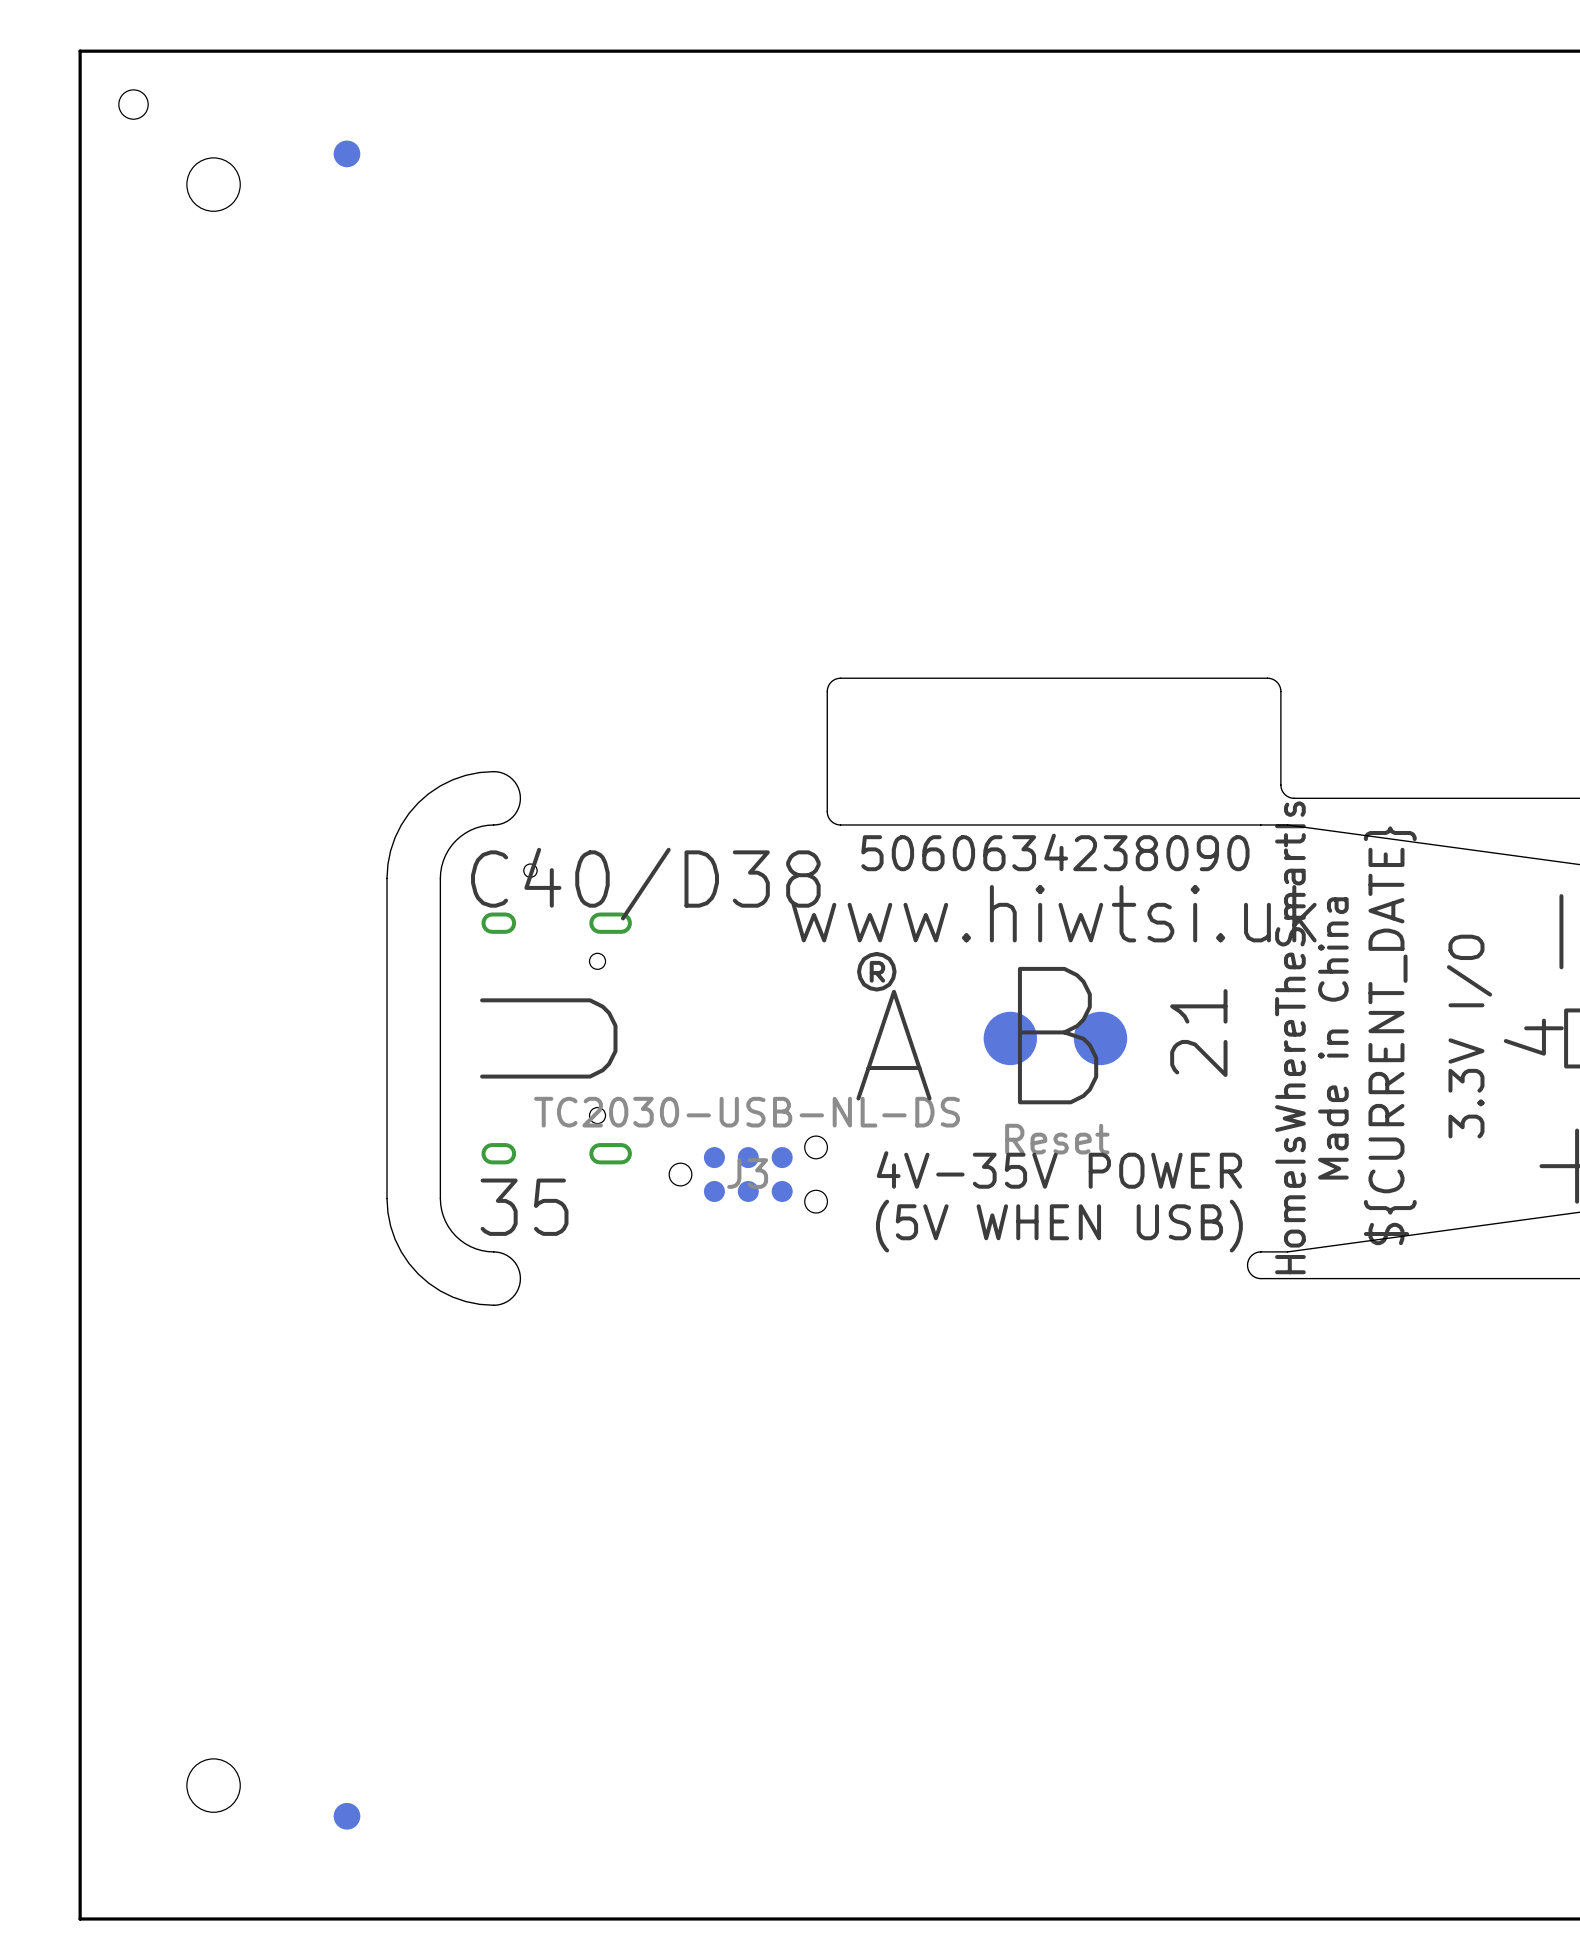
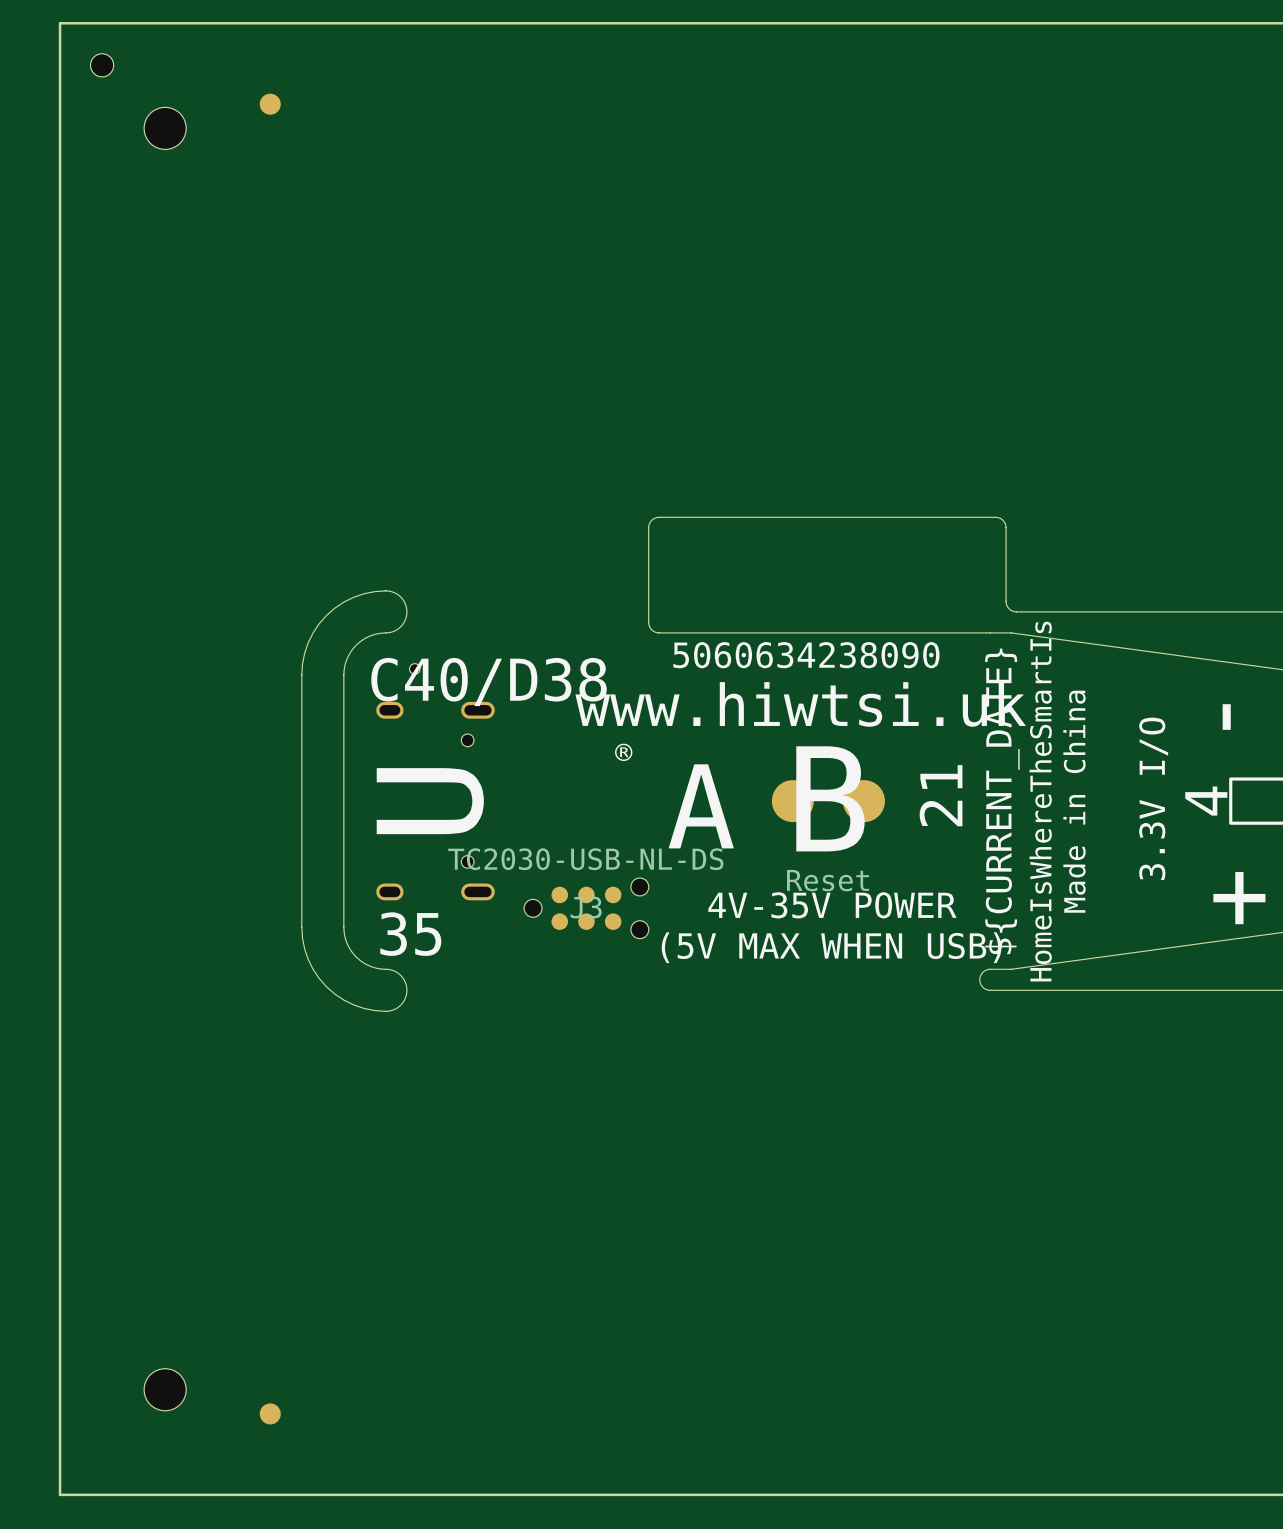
text position: 5060634238090 (1055, 852) -> 5060634238090 (806, 655)
text position: C40/D38 (645, 884) -> C40/D38 (489, 682)
text position: www.hiwtsi.uk (1054, 913) -> www.hiwtsi.uk (800, 704)
text position: ® (876, 971) -> ® (623, 752)
text position: ${CURRENT_DATE} (1390, 1035) -> ${CURRENT_DATE} (1002, 801)
text position: HomeIsWhereTheSmartIs (1290, 1037) -> HomeIsWhereTheSmartIs (1040, 801)
text position: Made in China (1333, 1038) -> Made in China (1074, 801)
text: (5V WHEN USB) (1059, 1226) -> (5V MAX WHEN USB) (831, 947)

